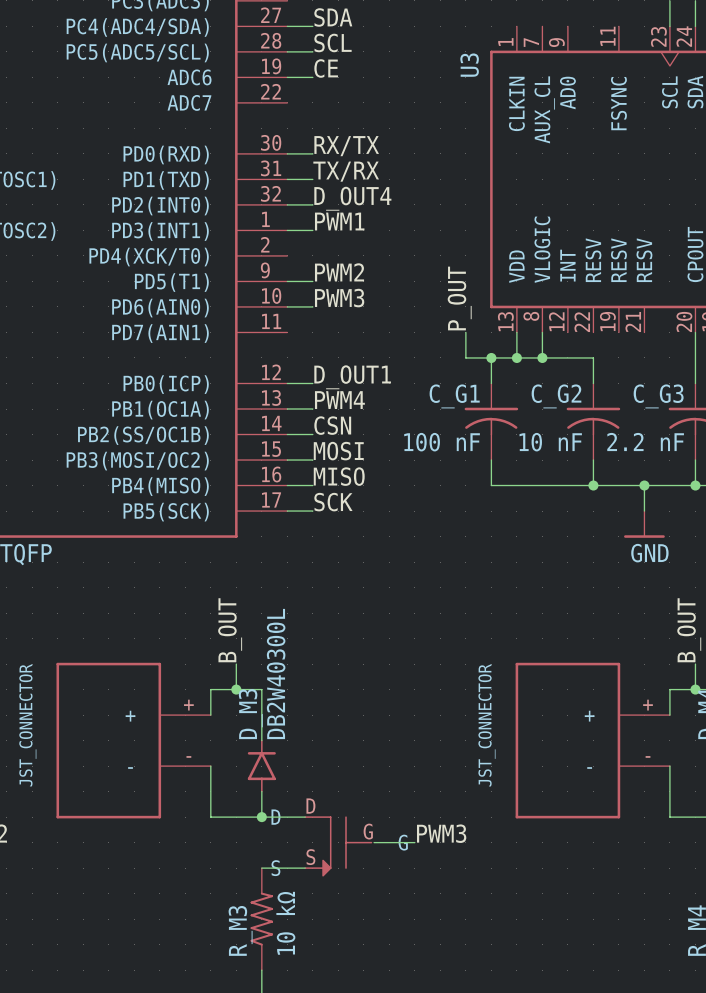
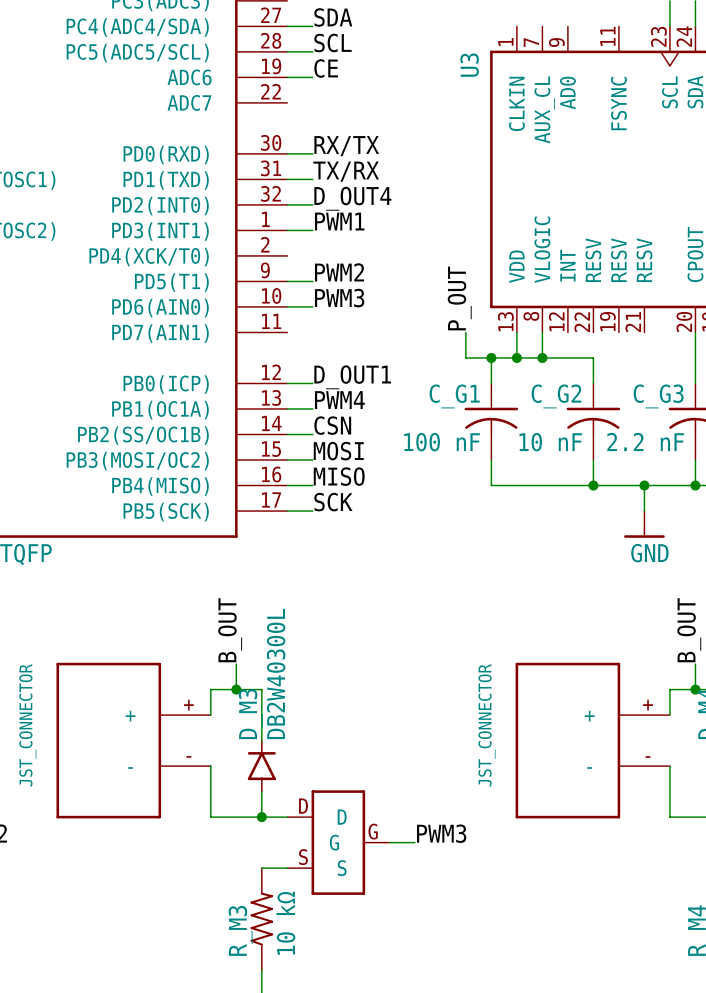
part symbol: [304, 816, 373, 877] -> [287, 790, 390, 895]

